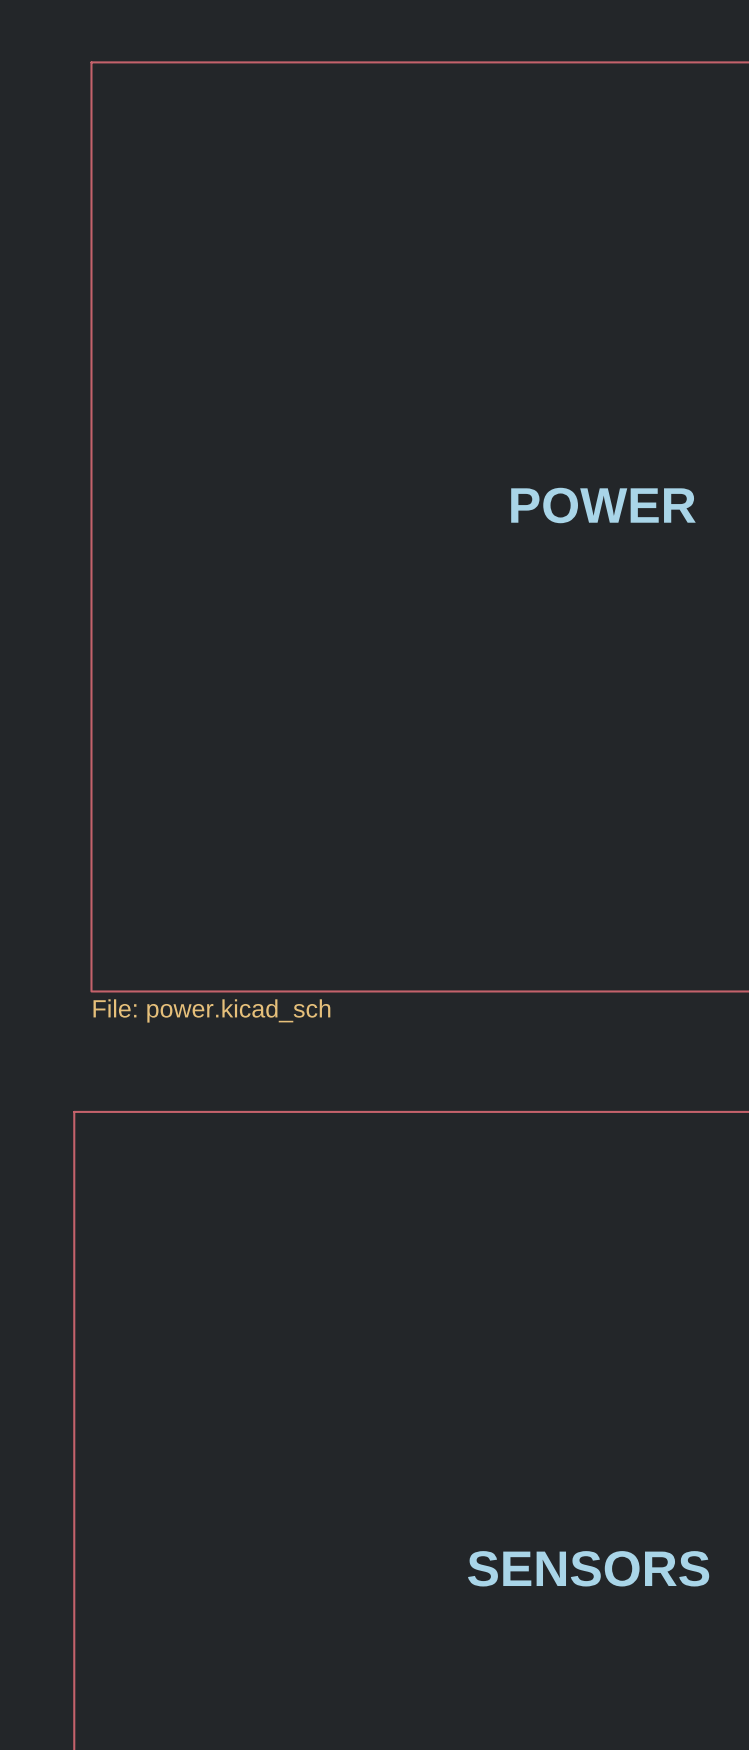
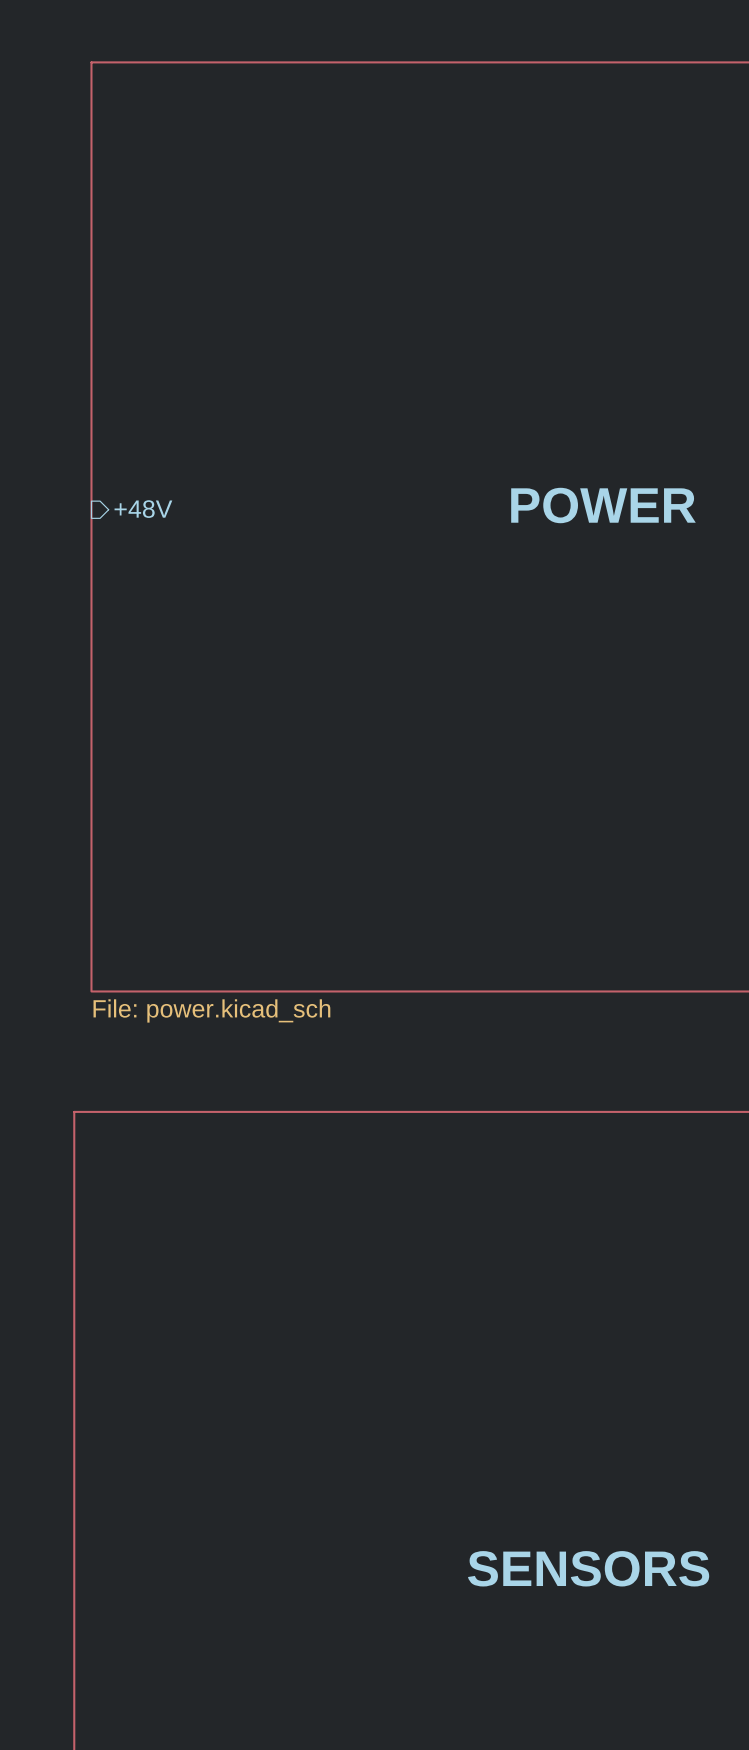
sheet pin: none -> +48V (143, 509)

